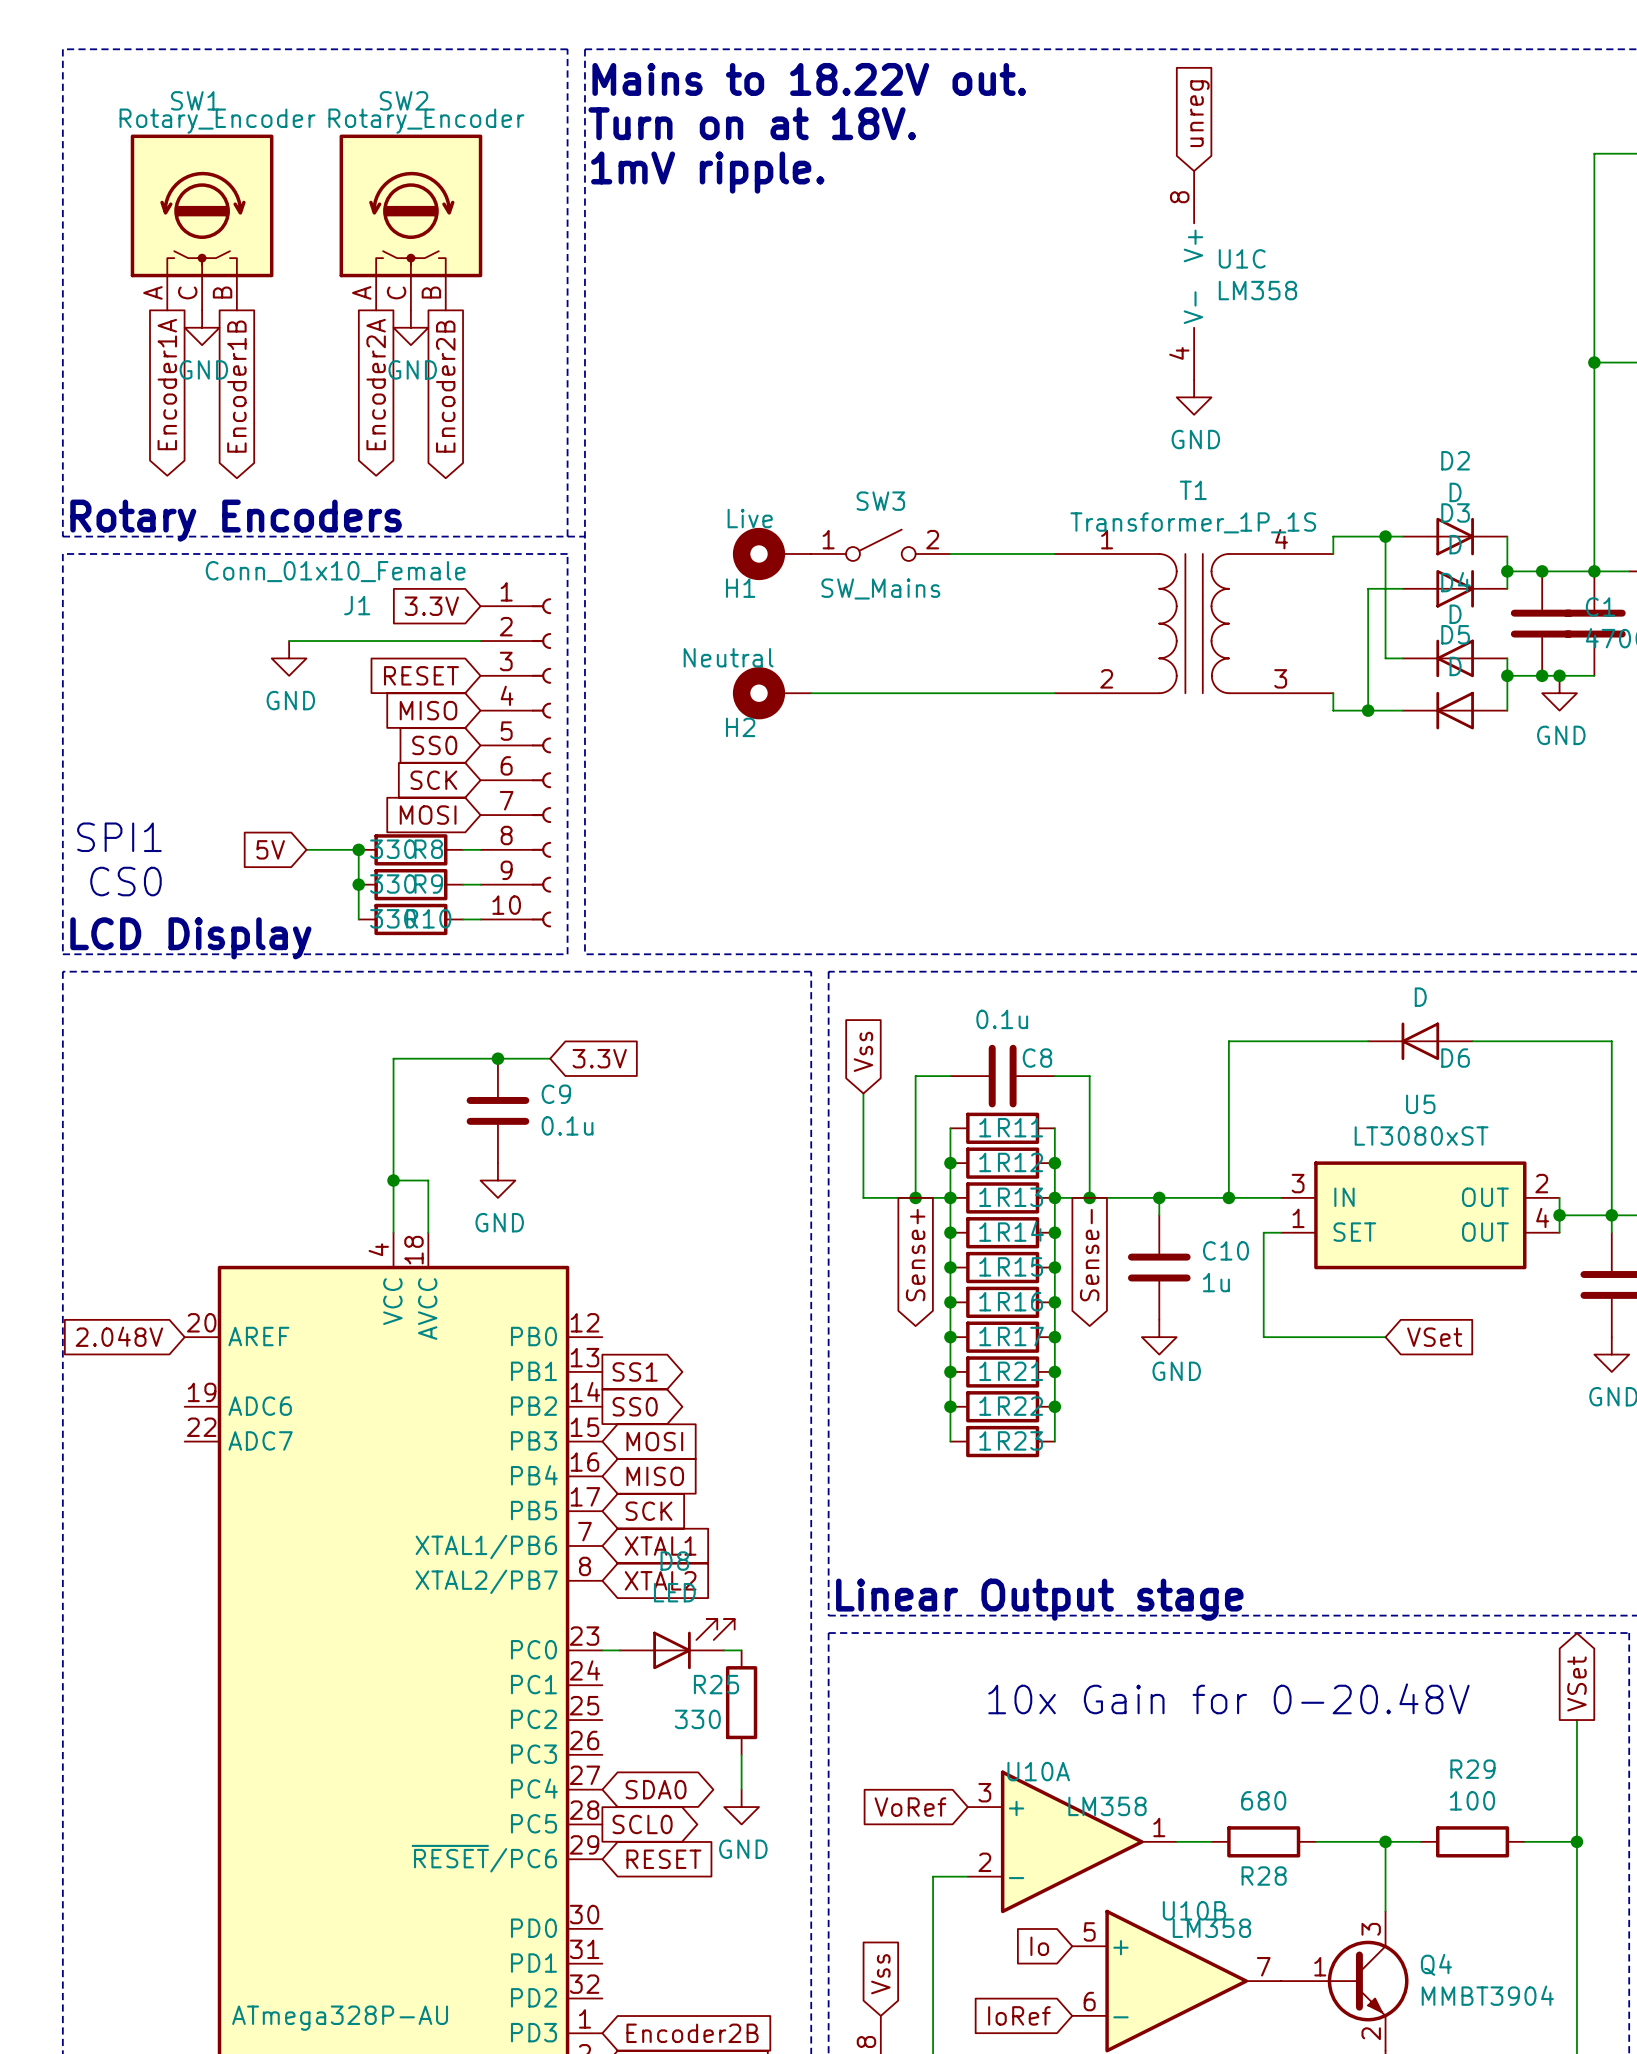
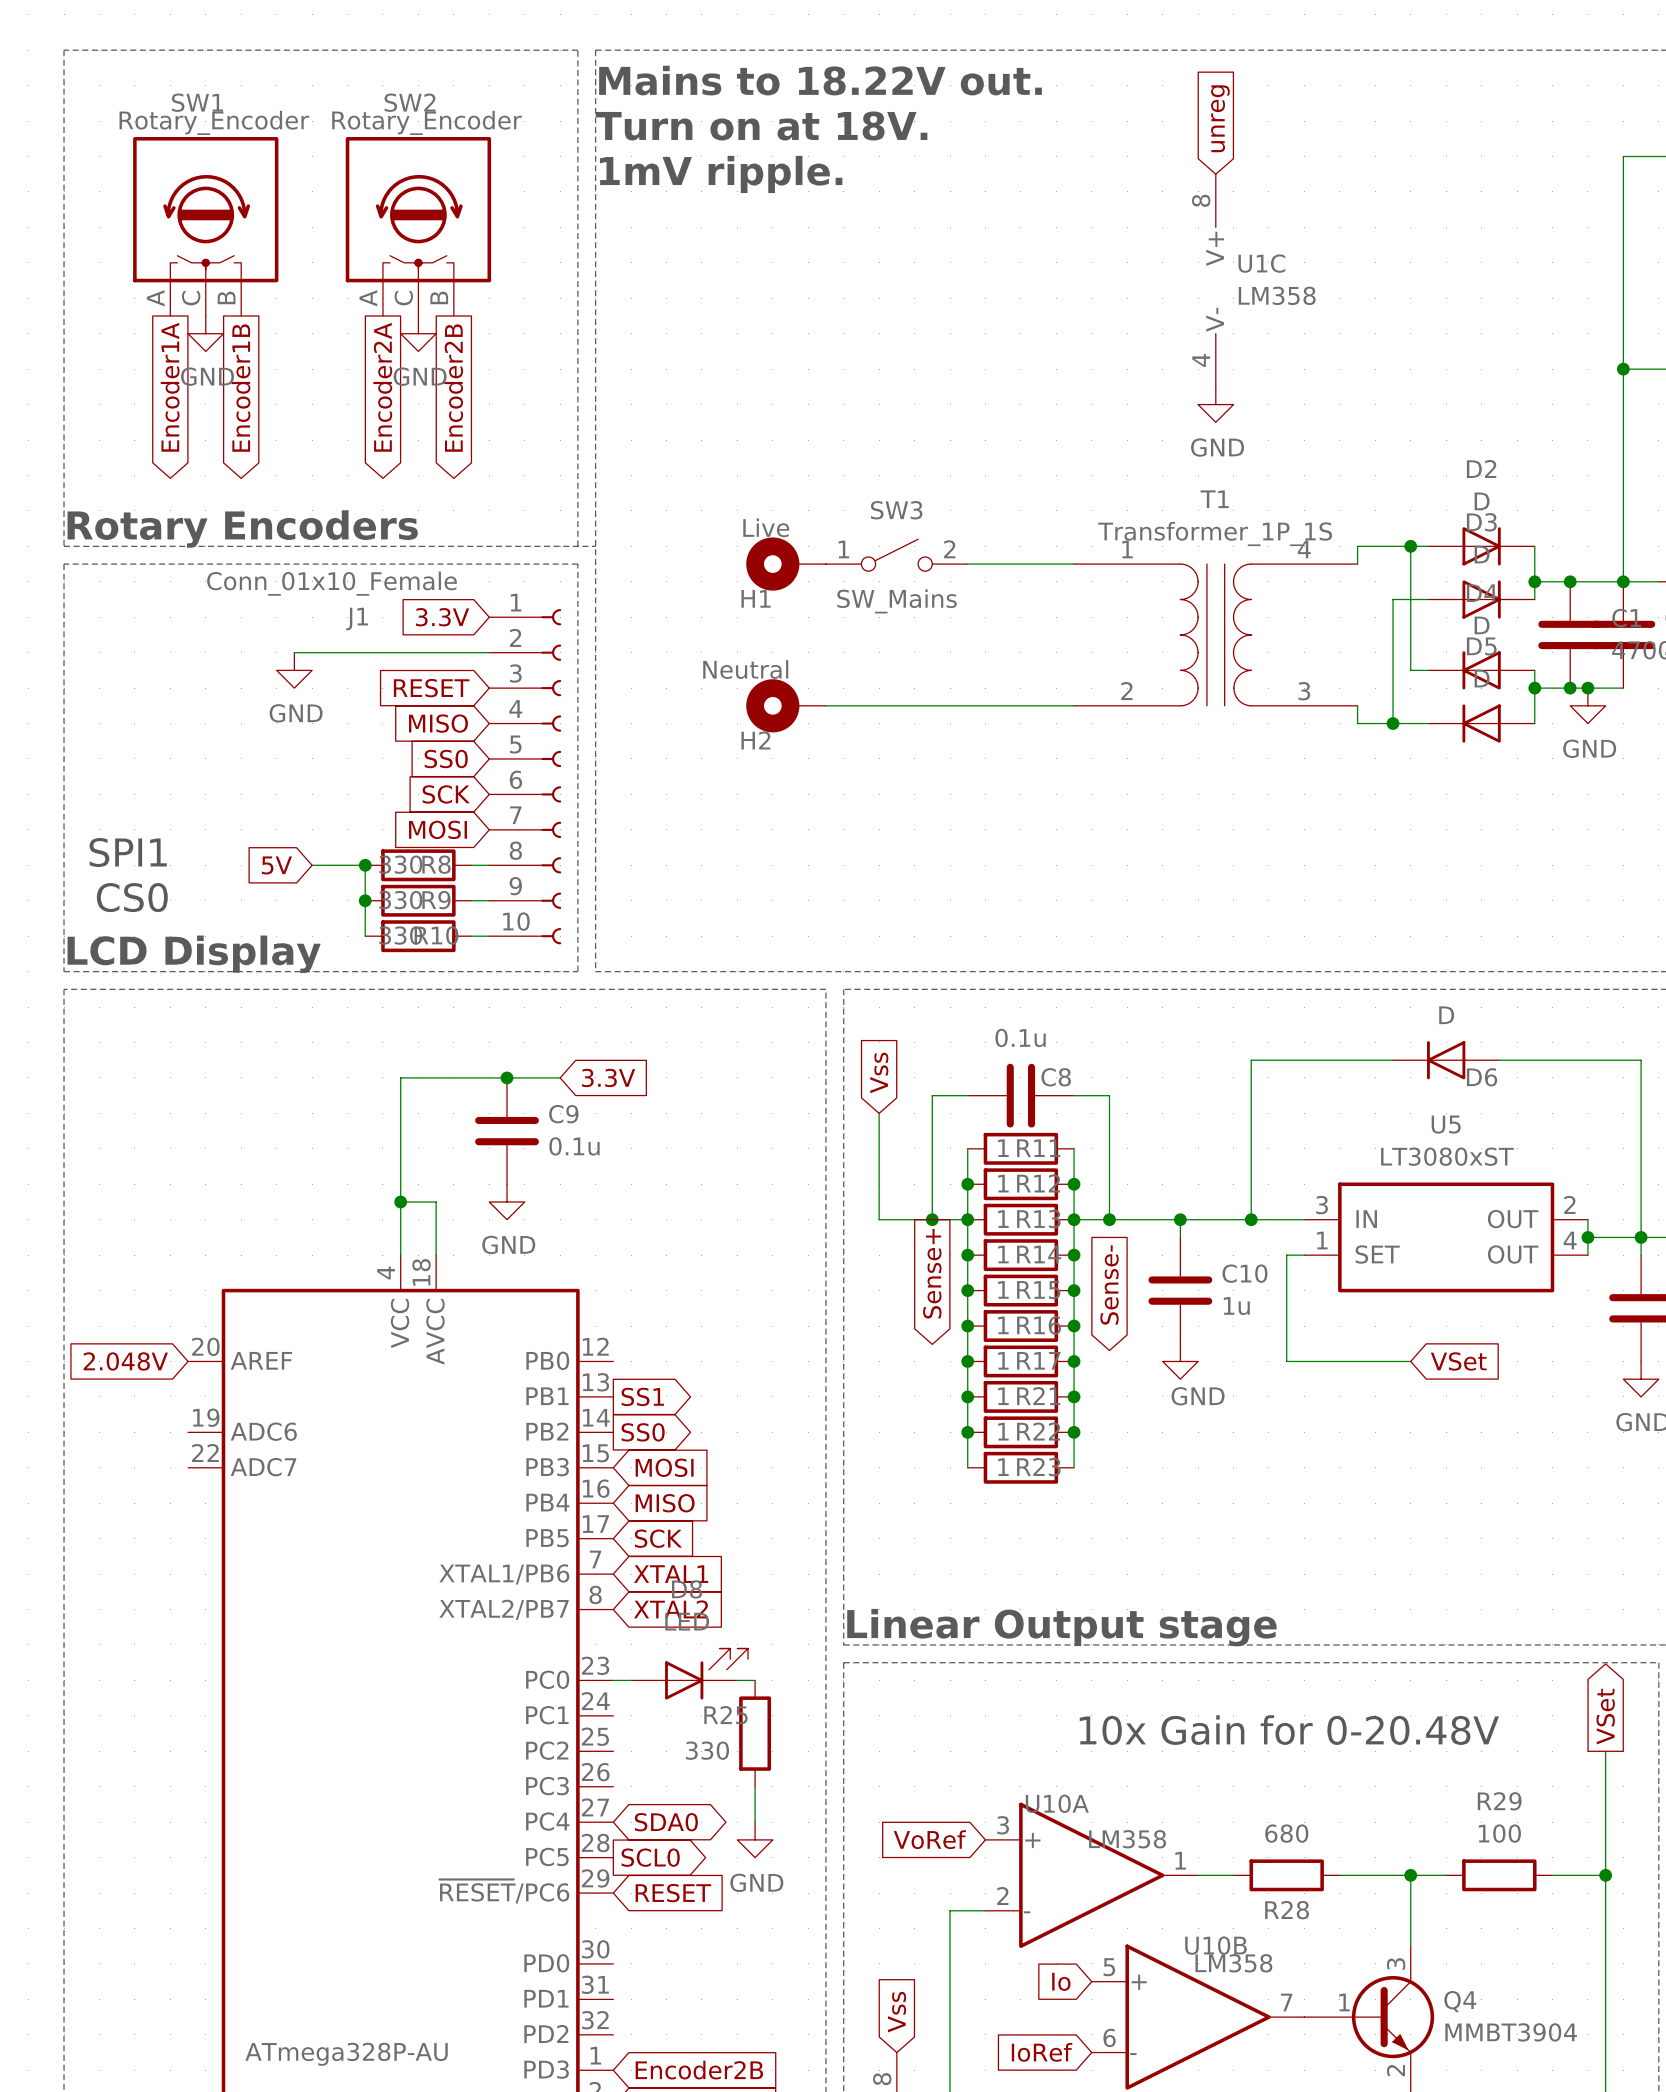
global label position: Sense- (1089, 1255) -> Sense- (1109, 1284)

